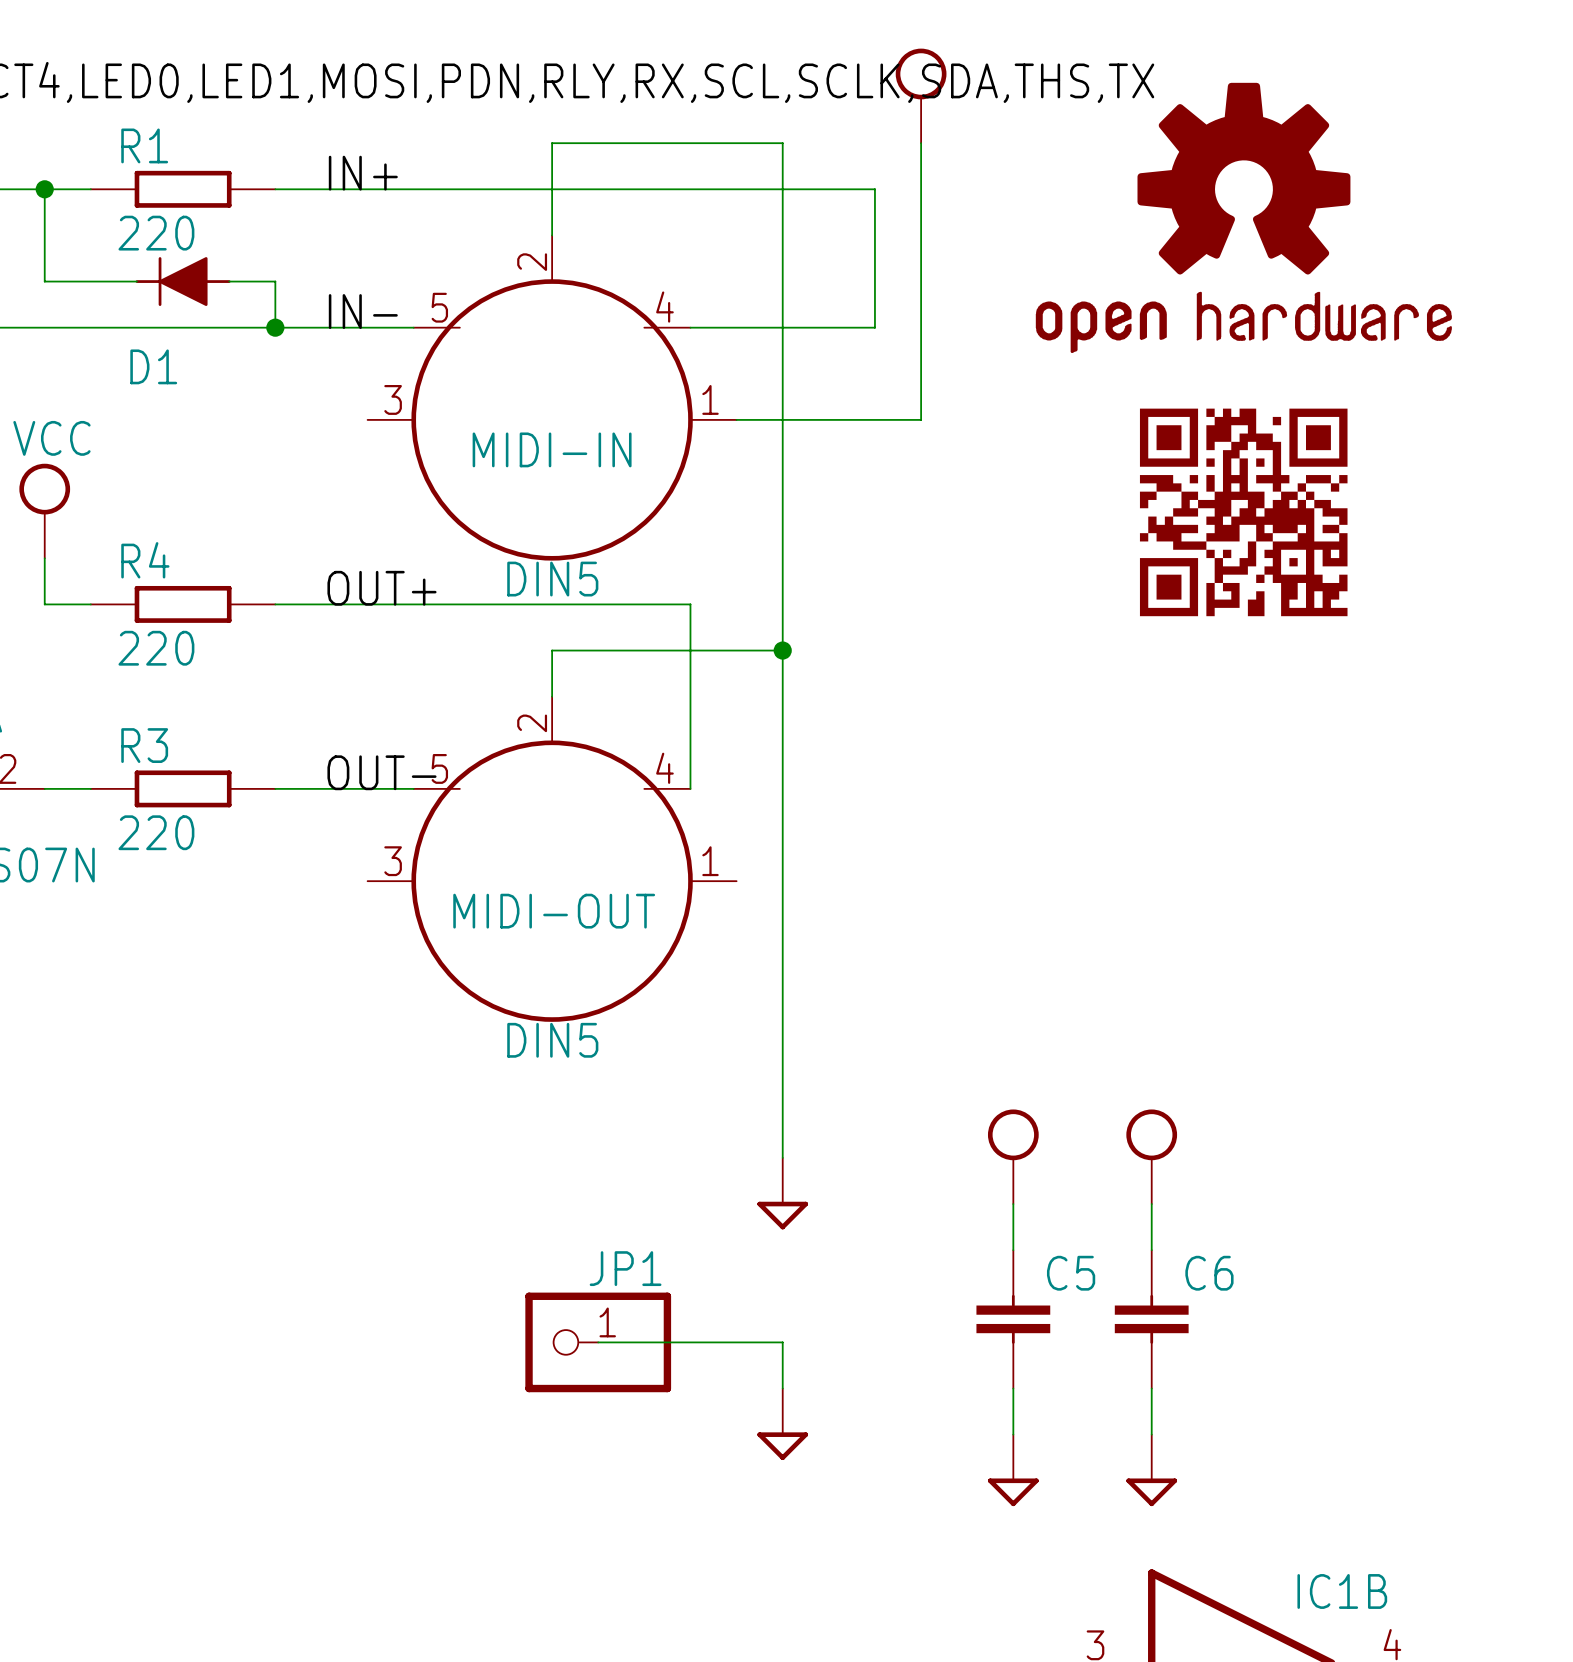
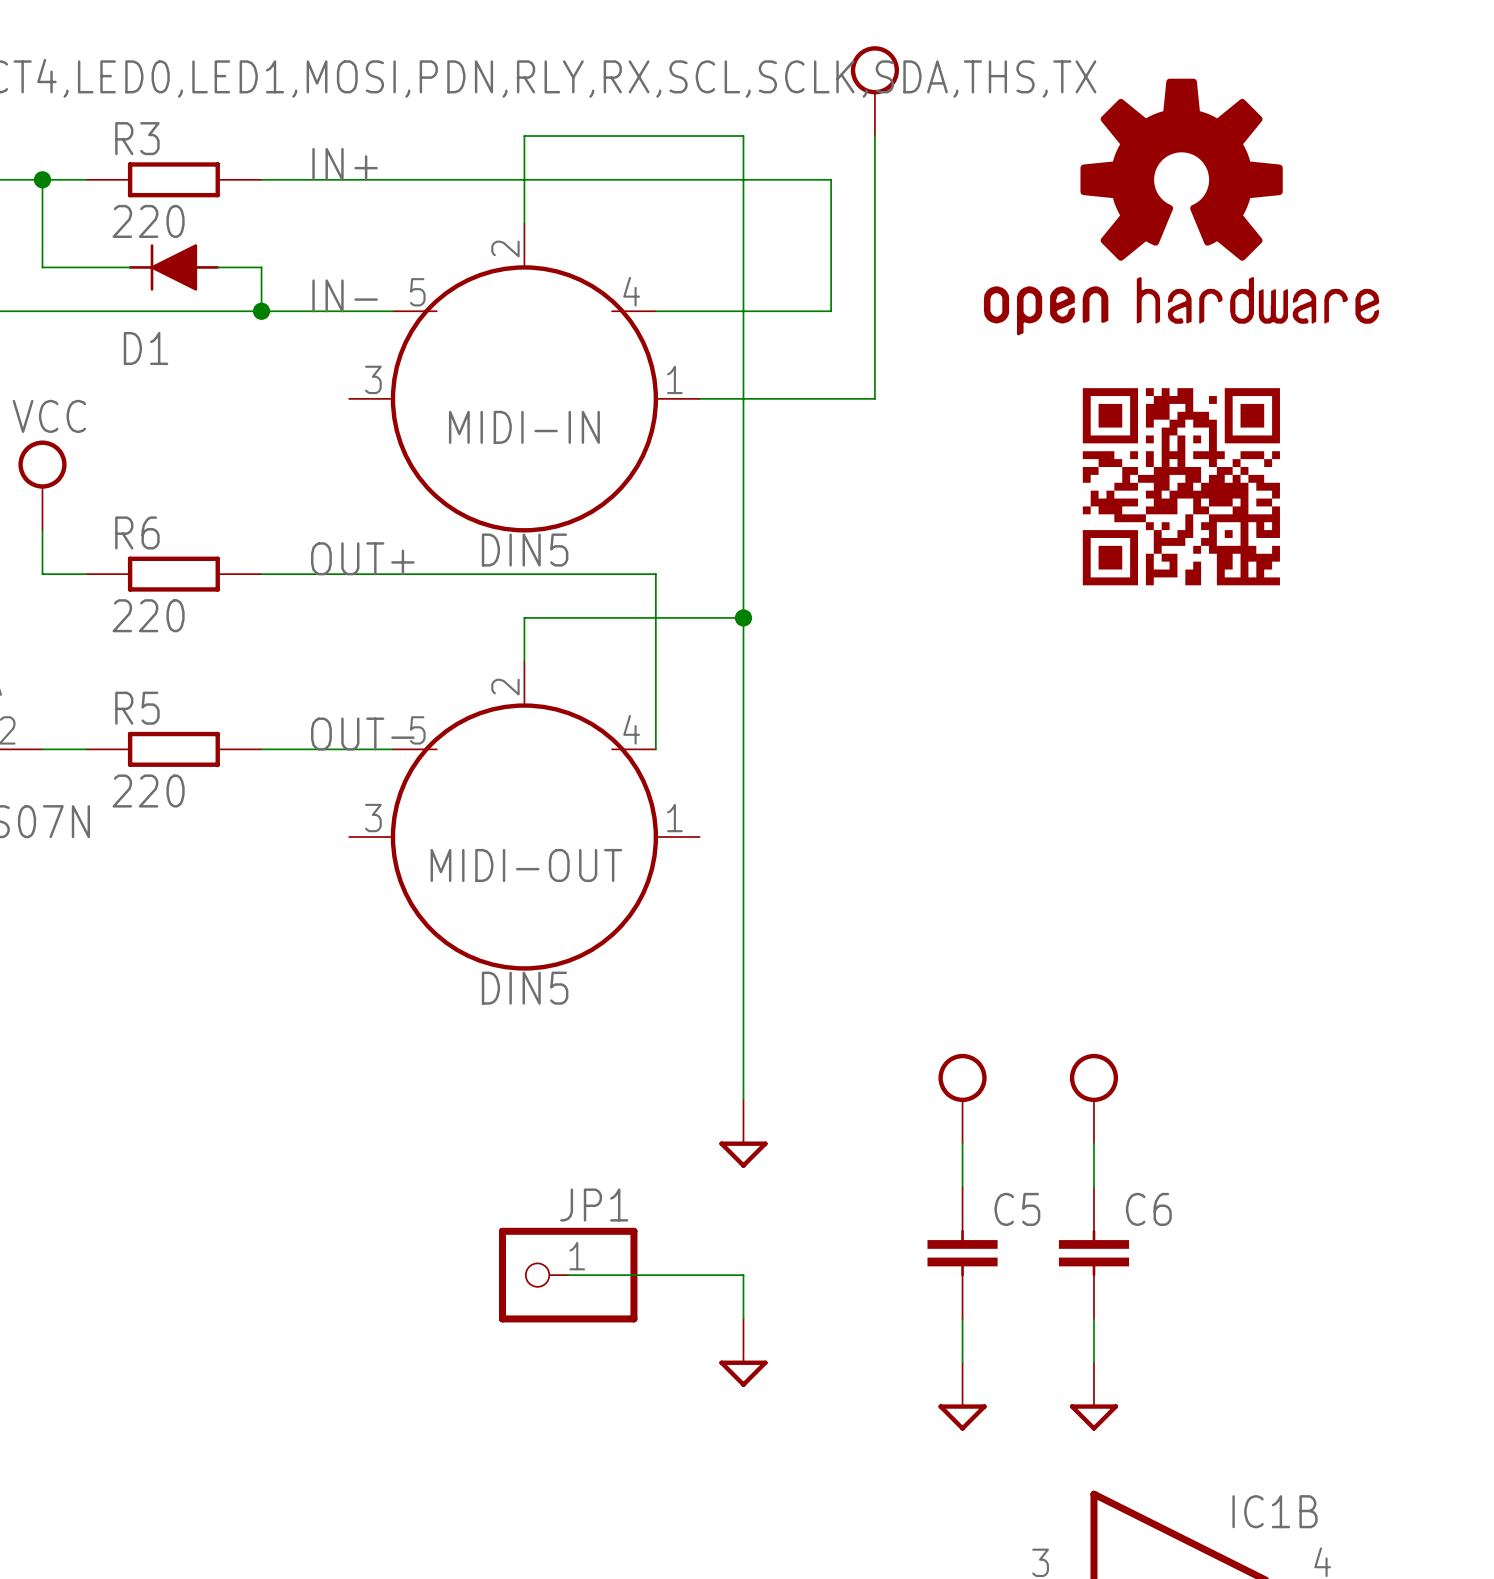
R1 name: R1 (144, 145) -> R3 (137, 138)
R4 name: R4 (145, 560) -> R6 (137, 532)
R3 name: R3 (144, 745) -> R5 (137, 708)

